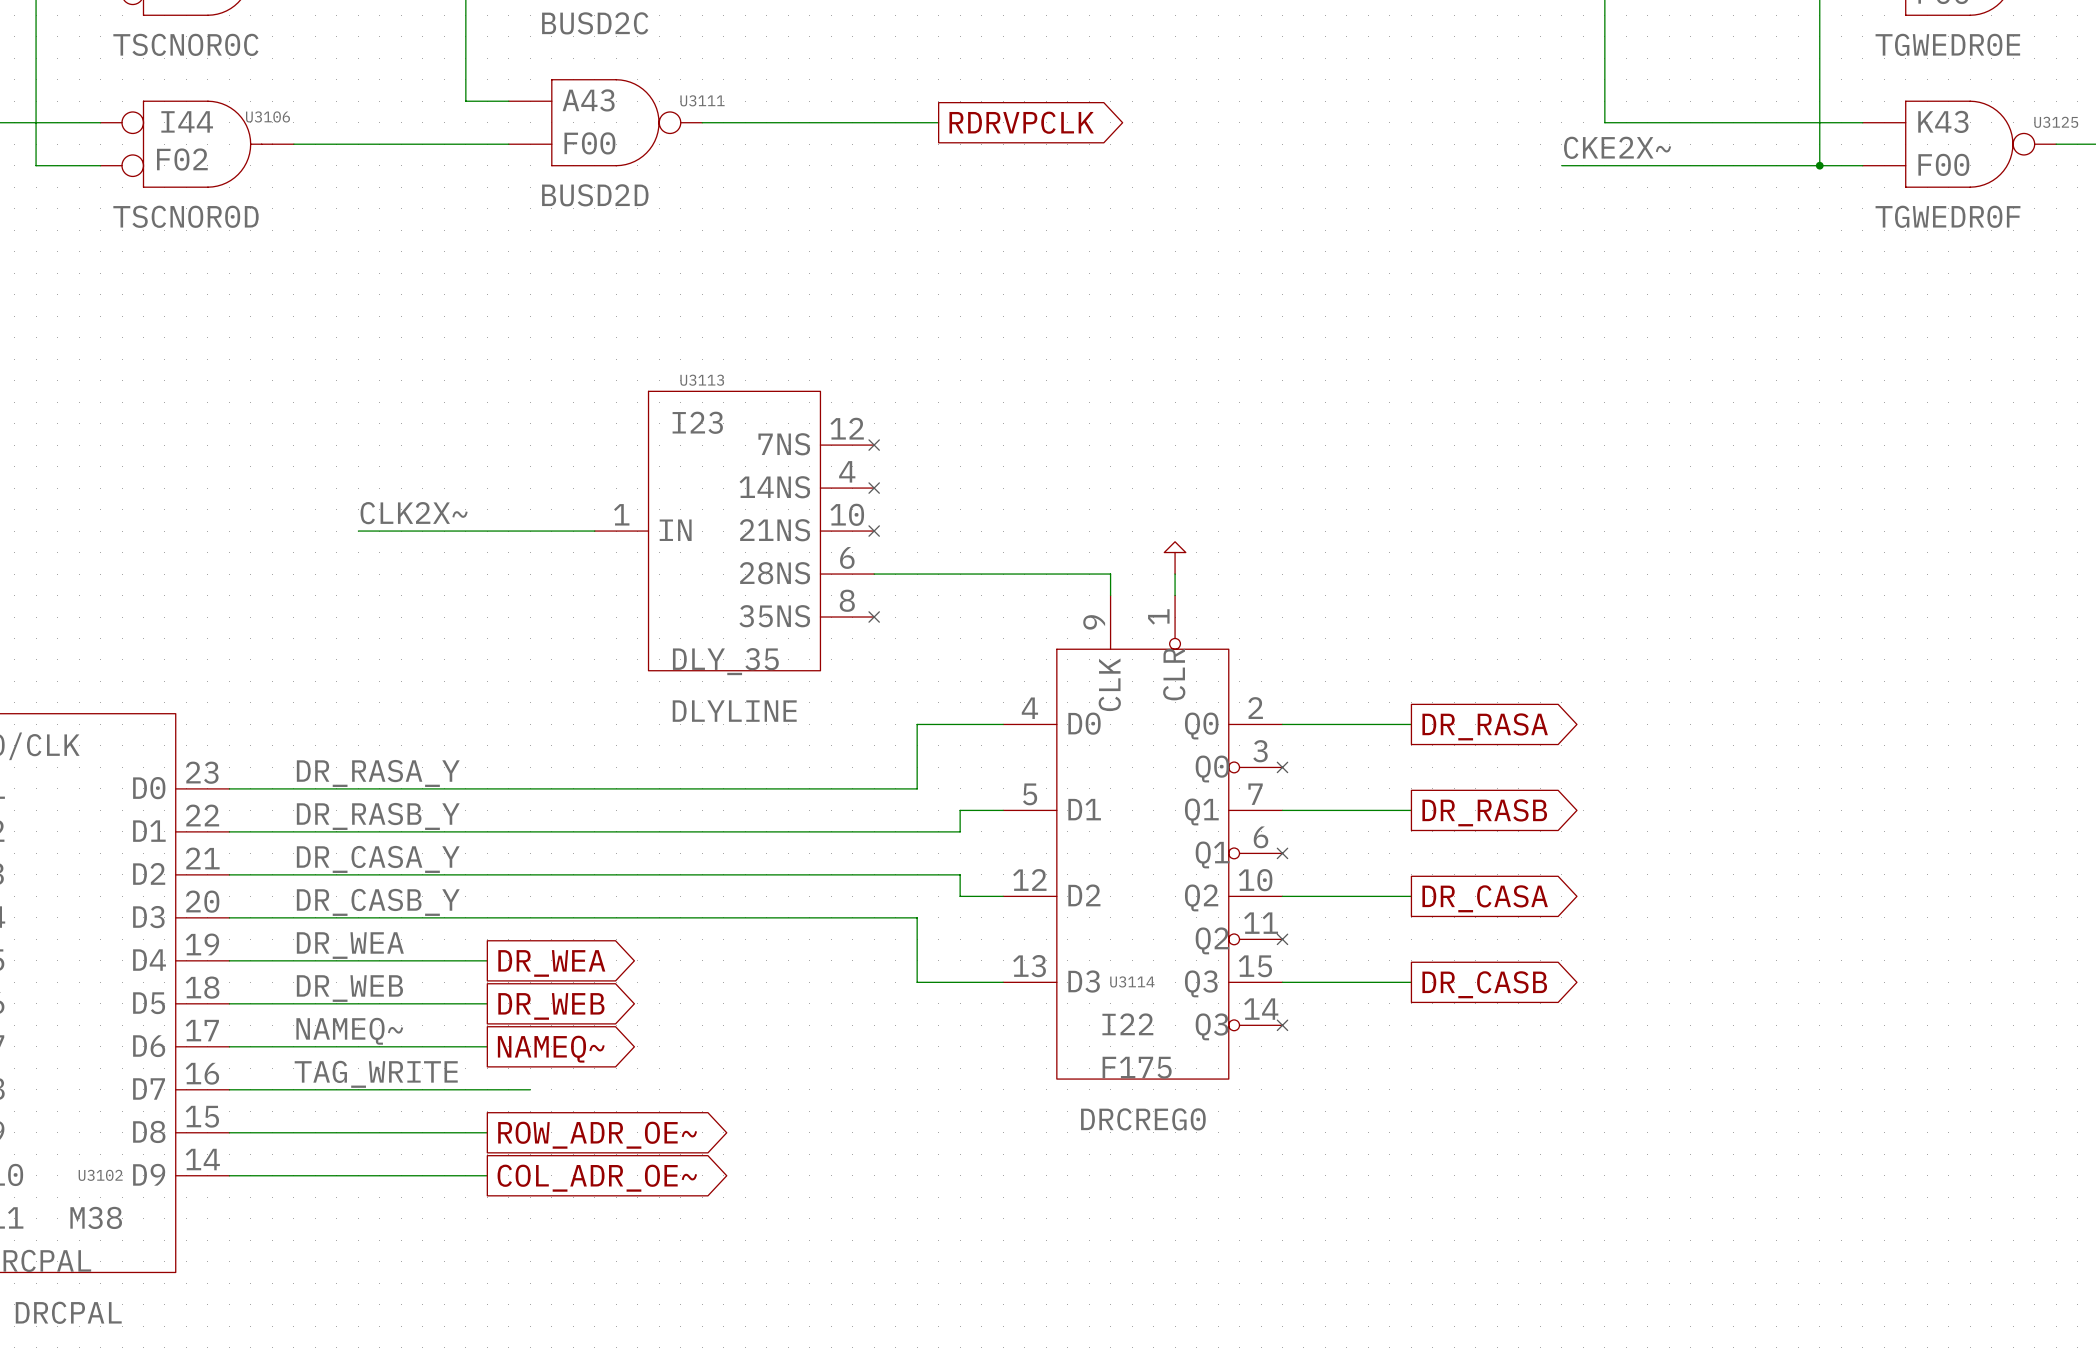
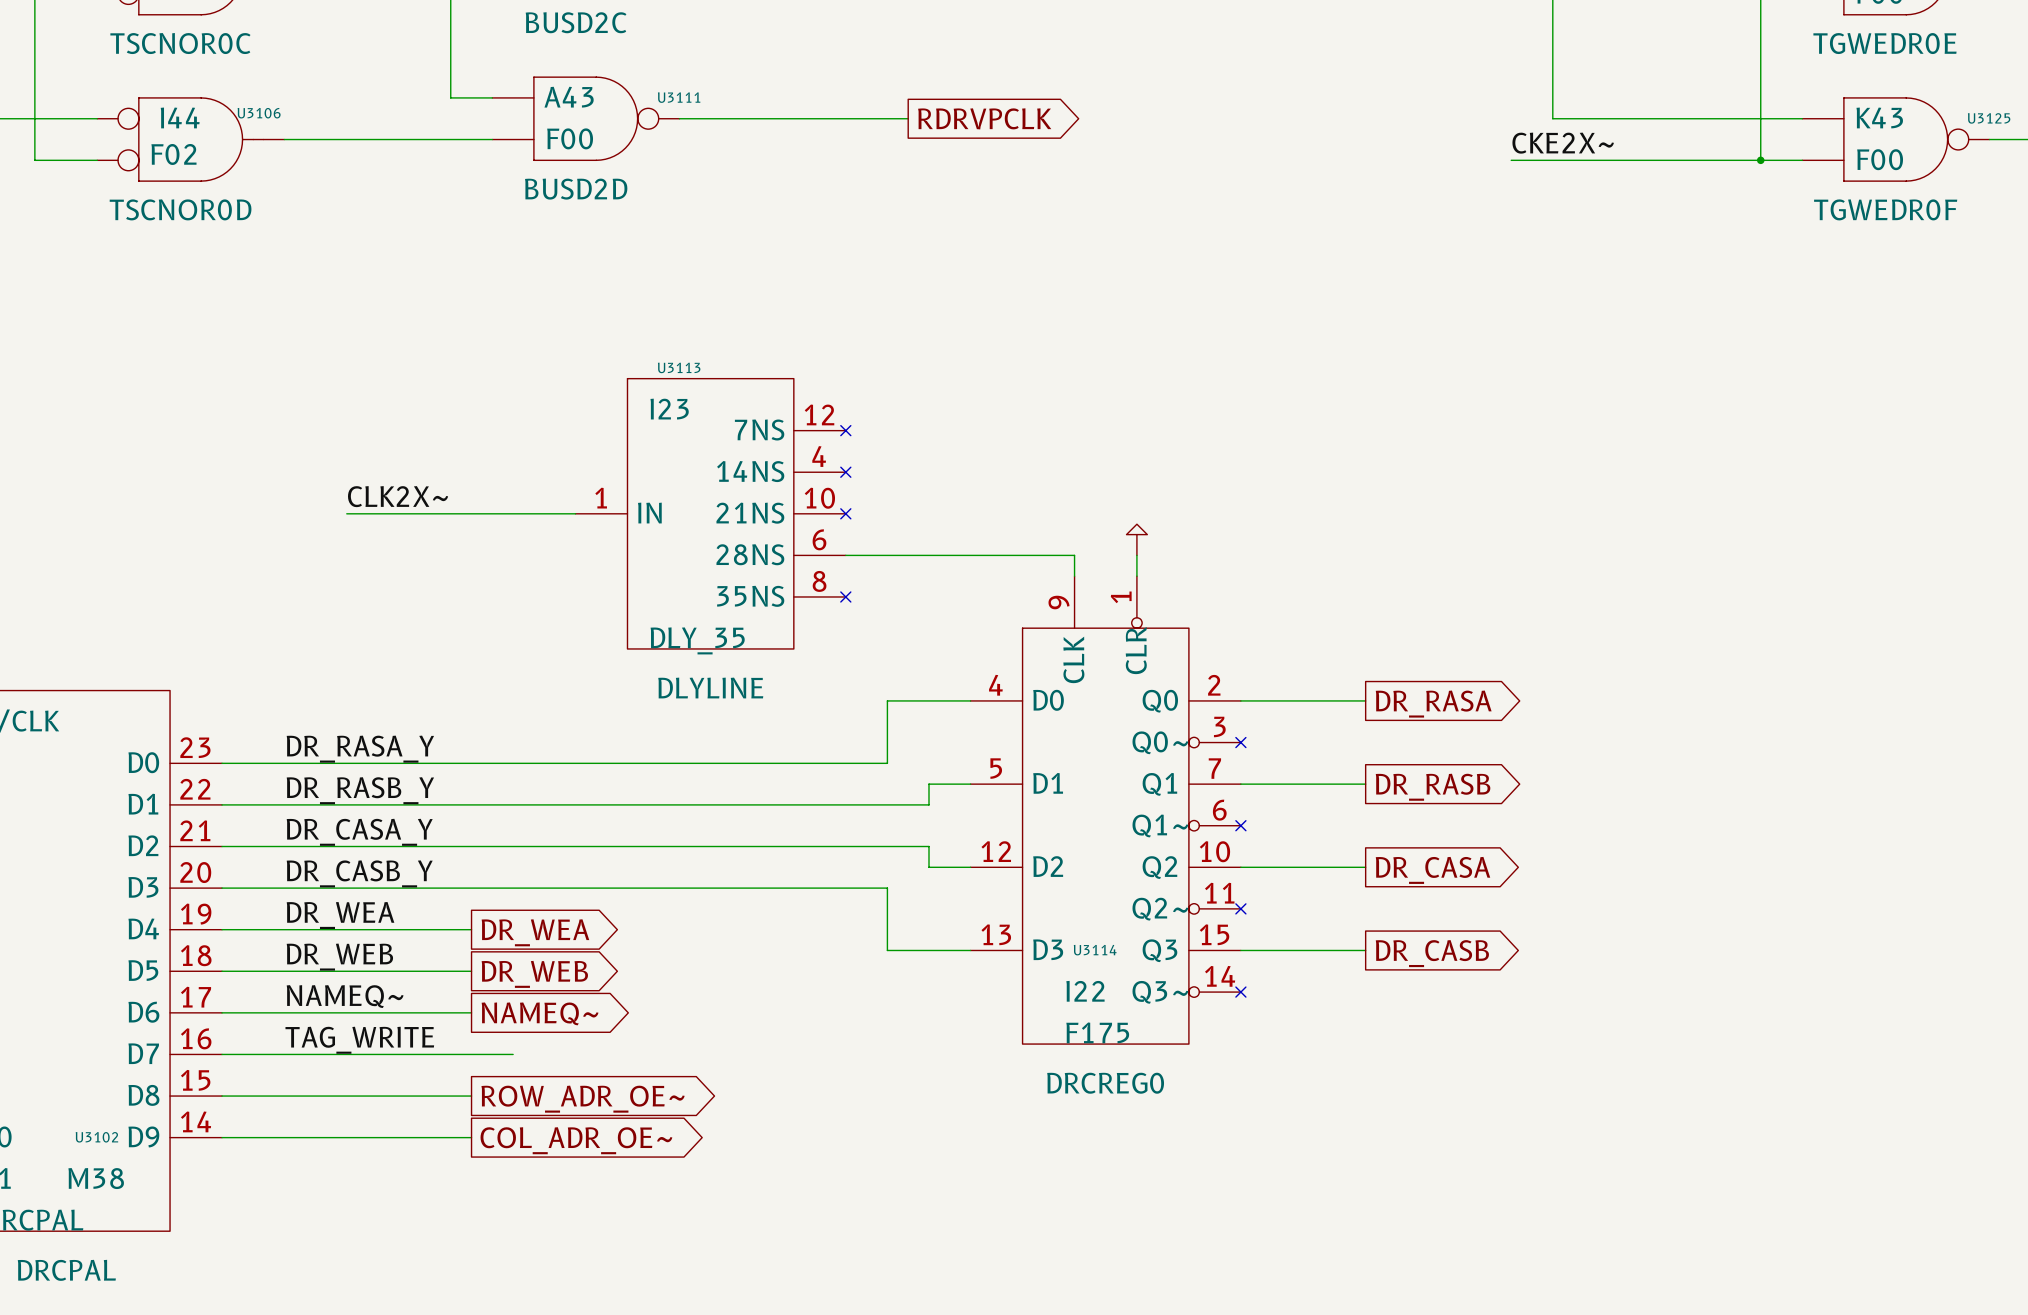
U3114 pin name: Q0 (1212, 768) -> Q0~ (1160, 742)
U3114 pin name: Q1 (1212, 854) -> Q1~ (1160, 825)
U3114 pin name: Q2 (1212, 940) -> Q2~ (1160, 909)
U3114 pin name: Q3 (1212, 1026) -> Q3~ (1160, 992)

